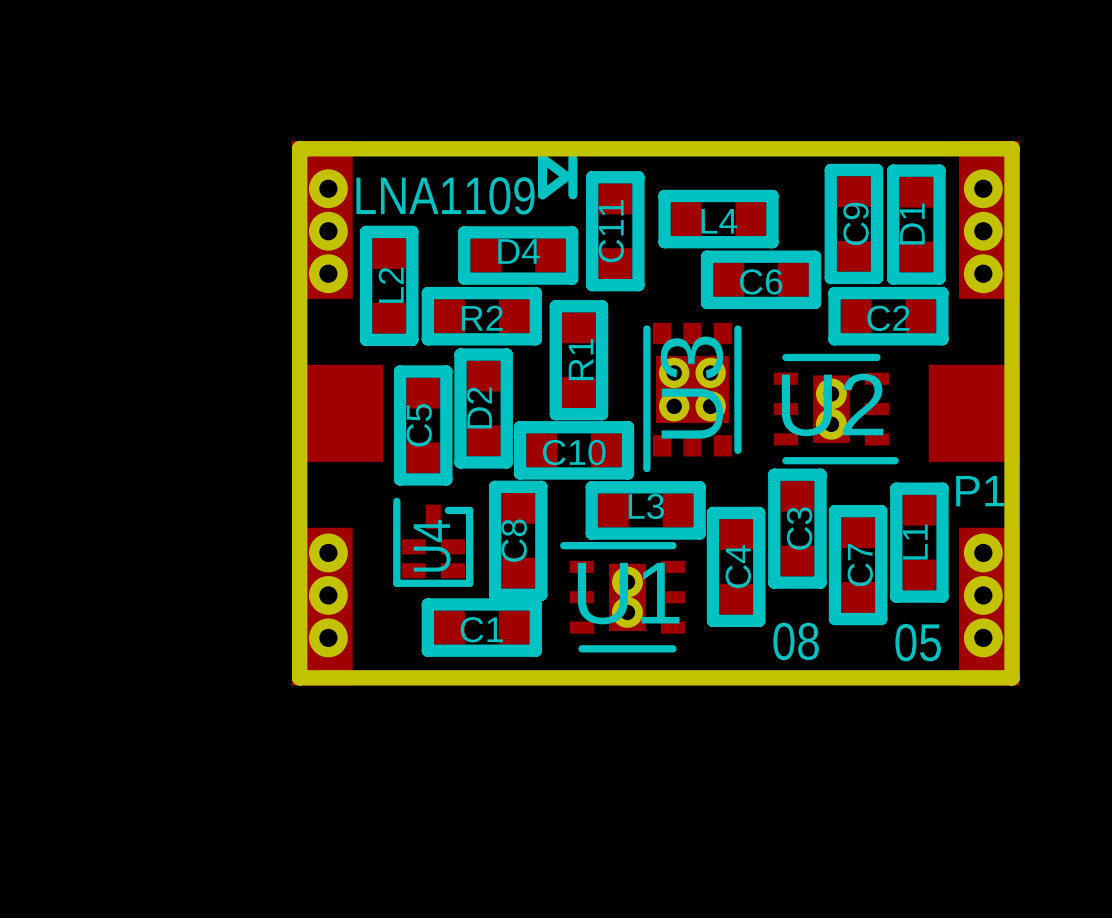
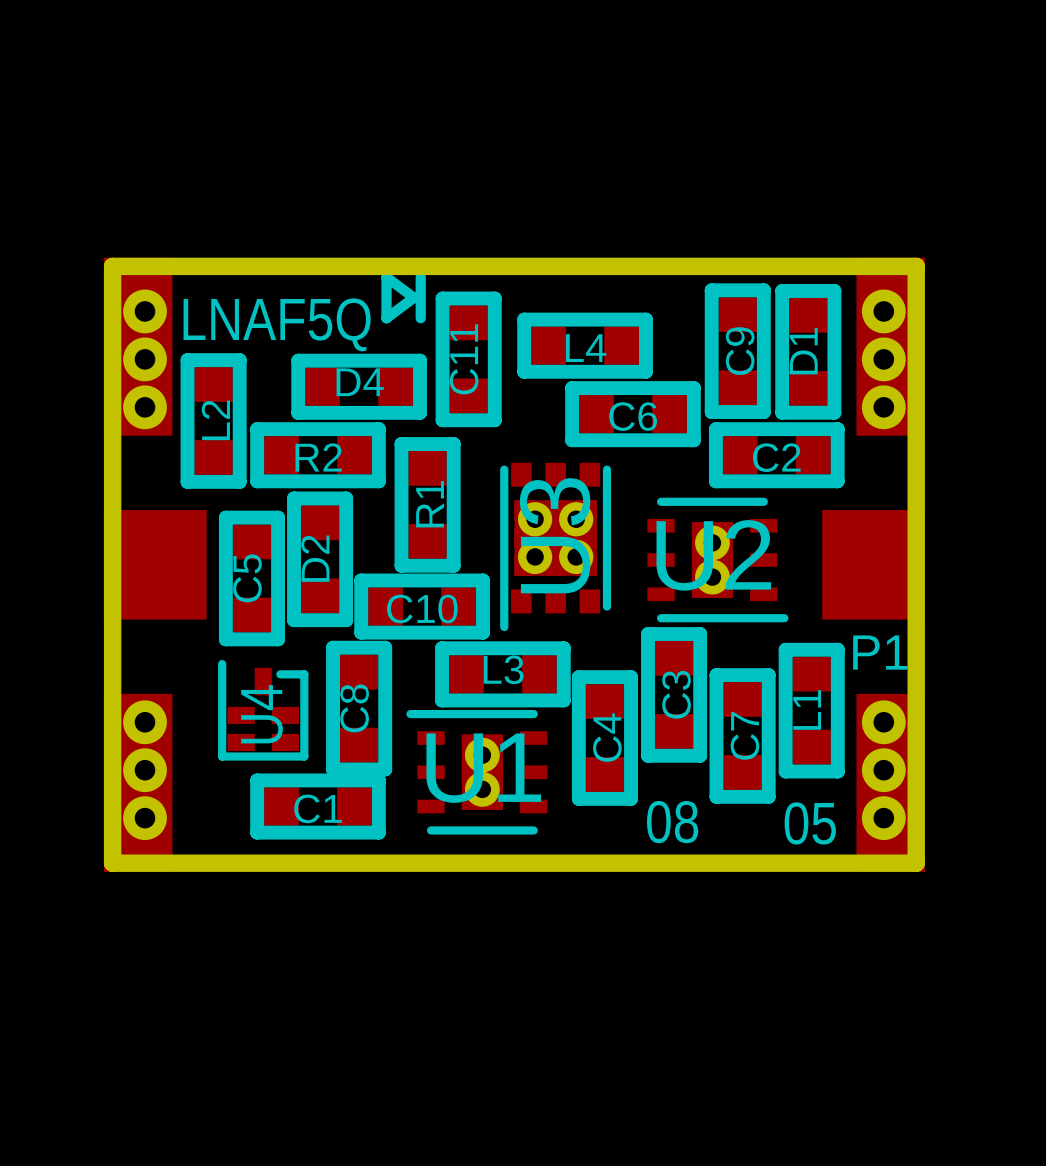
text: LNA1109 (445, 195) -> LNAF5Q (277, 324)

